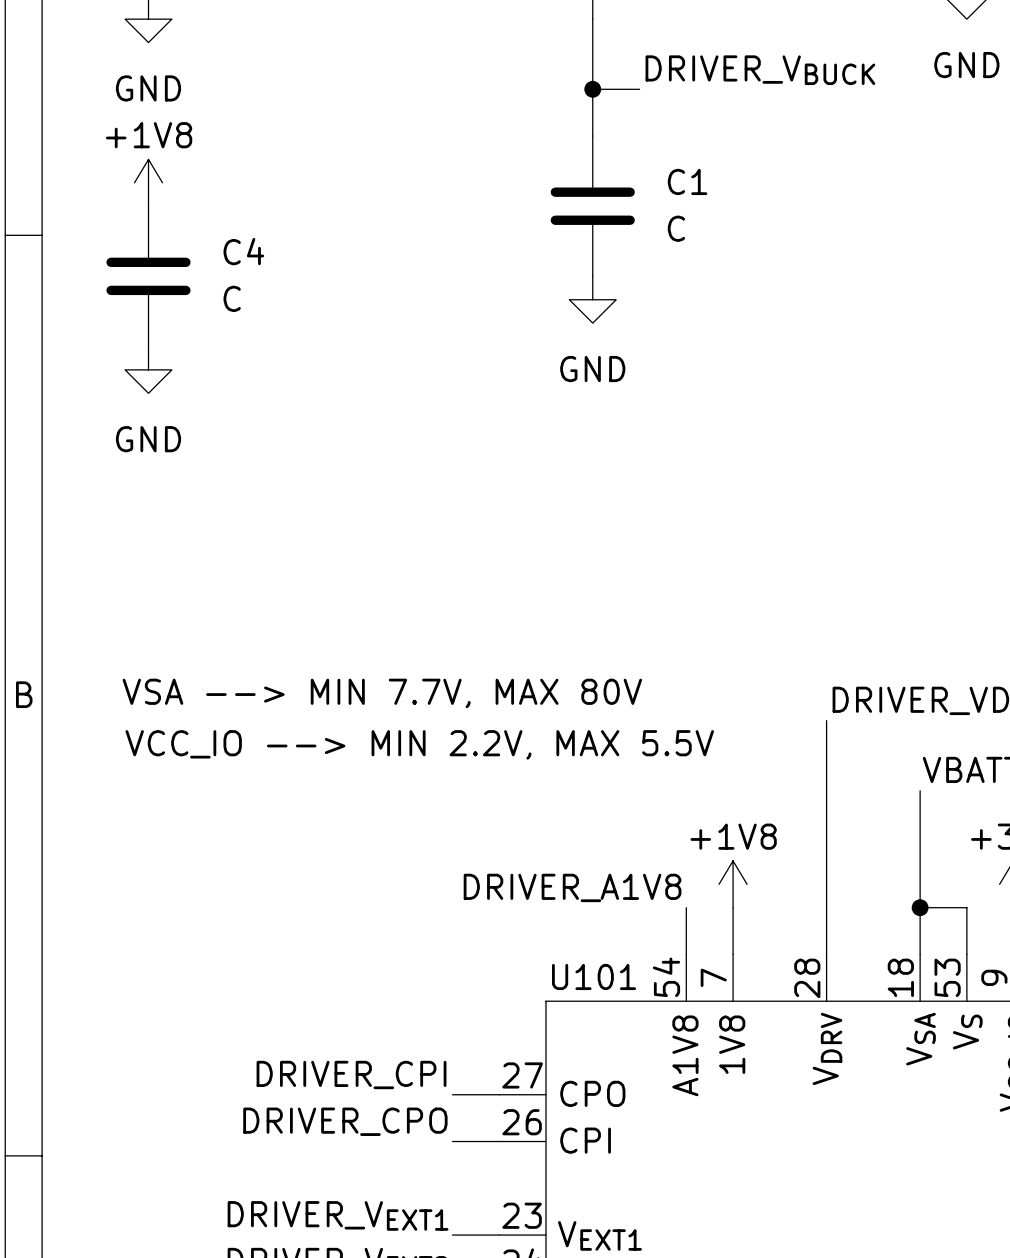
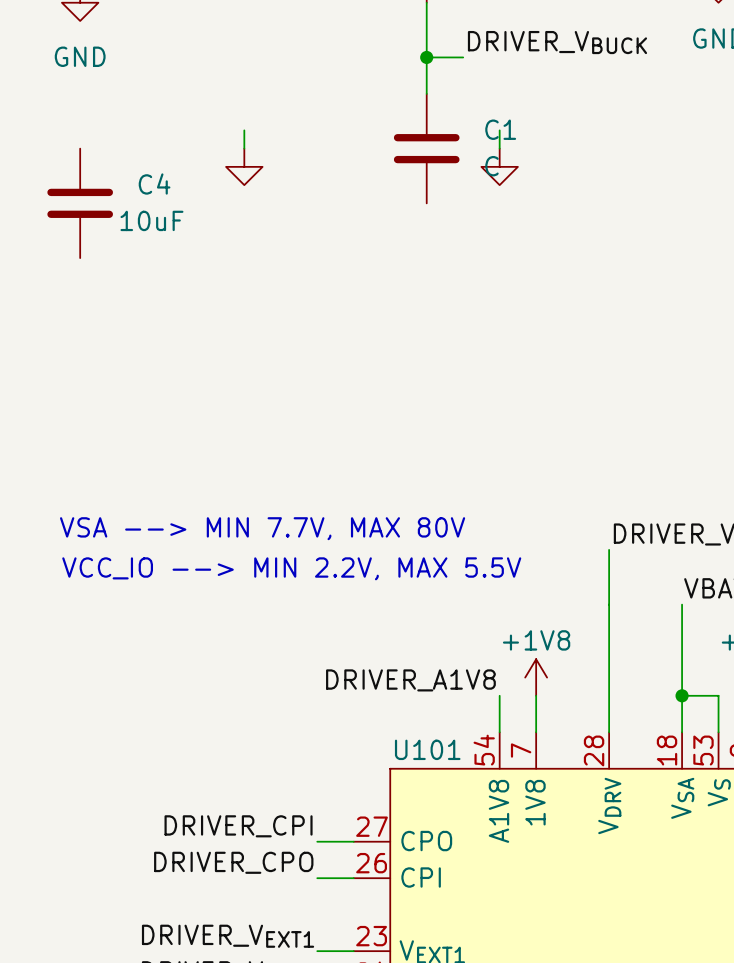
power symbol: +1V8 (148, 182) -> none
wire: none -> (244, 130) (244, 148)
wire: none -> (499, 130) (499, 148)
power symbol: none -> (244, 166)
power symbol: none -> (499, 166)
C4 value: C (232, 298) -> 10uF (151, 220)
power symbol: GND (592, 299) -> none
power symbol: GND (148, 369) -> none

